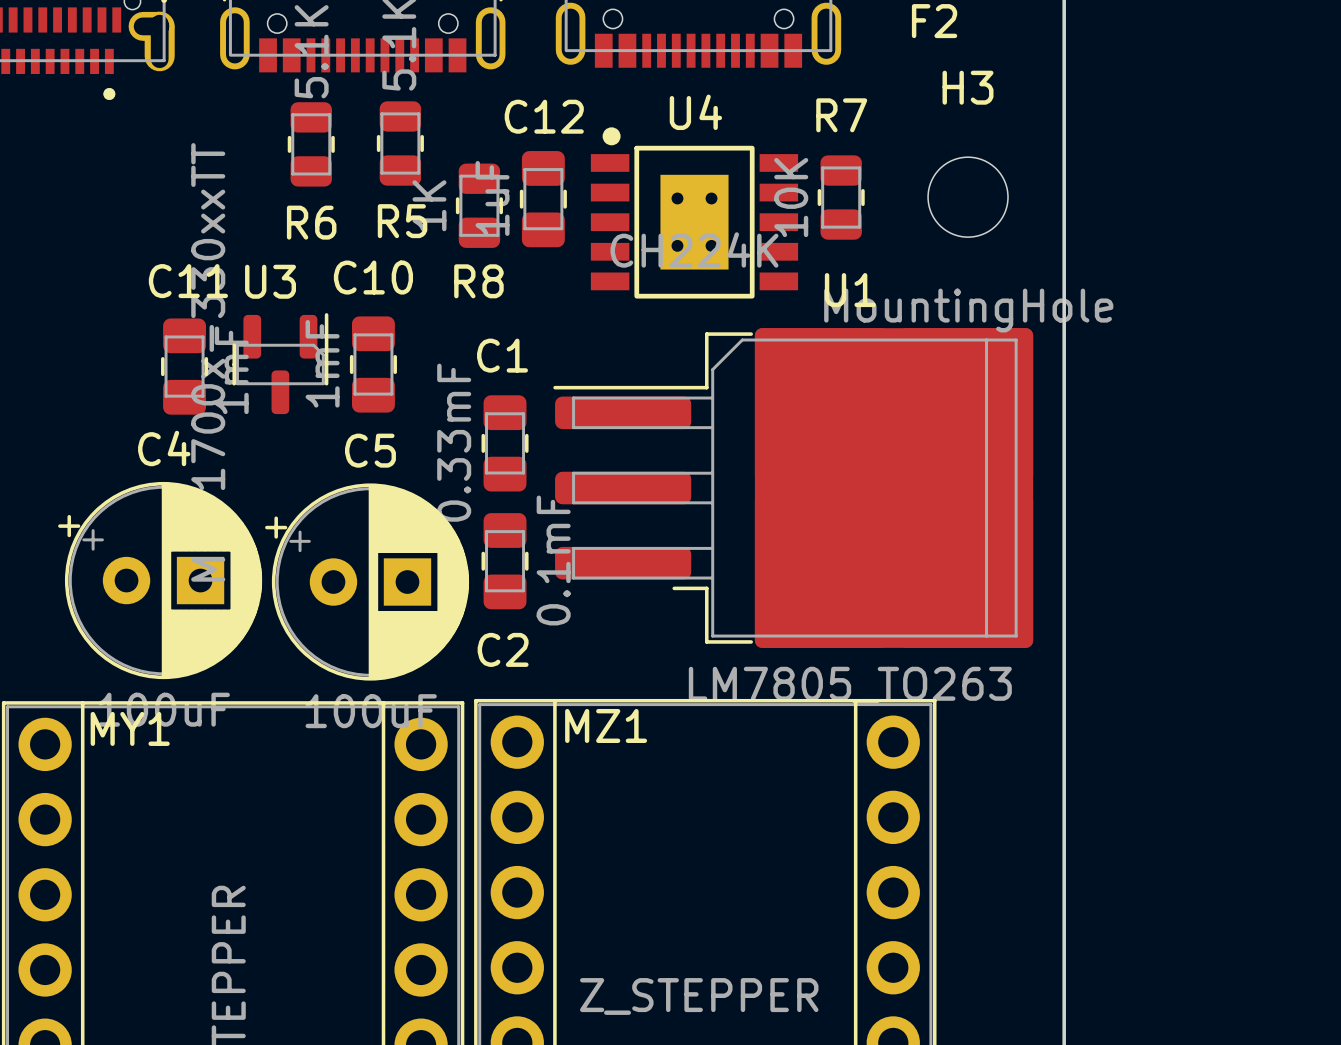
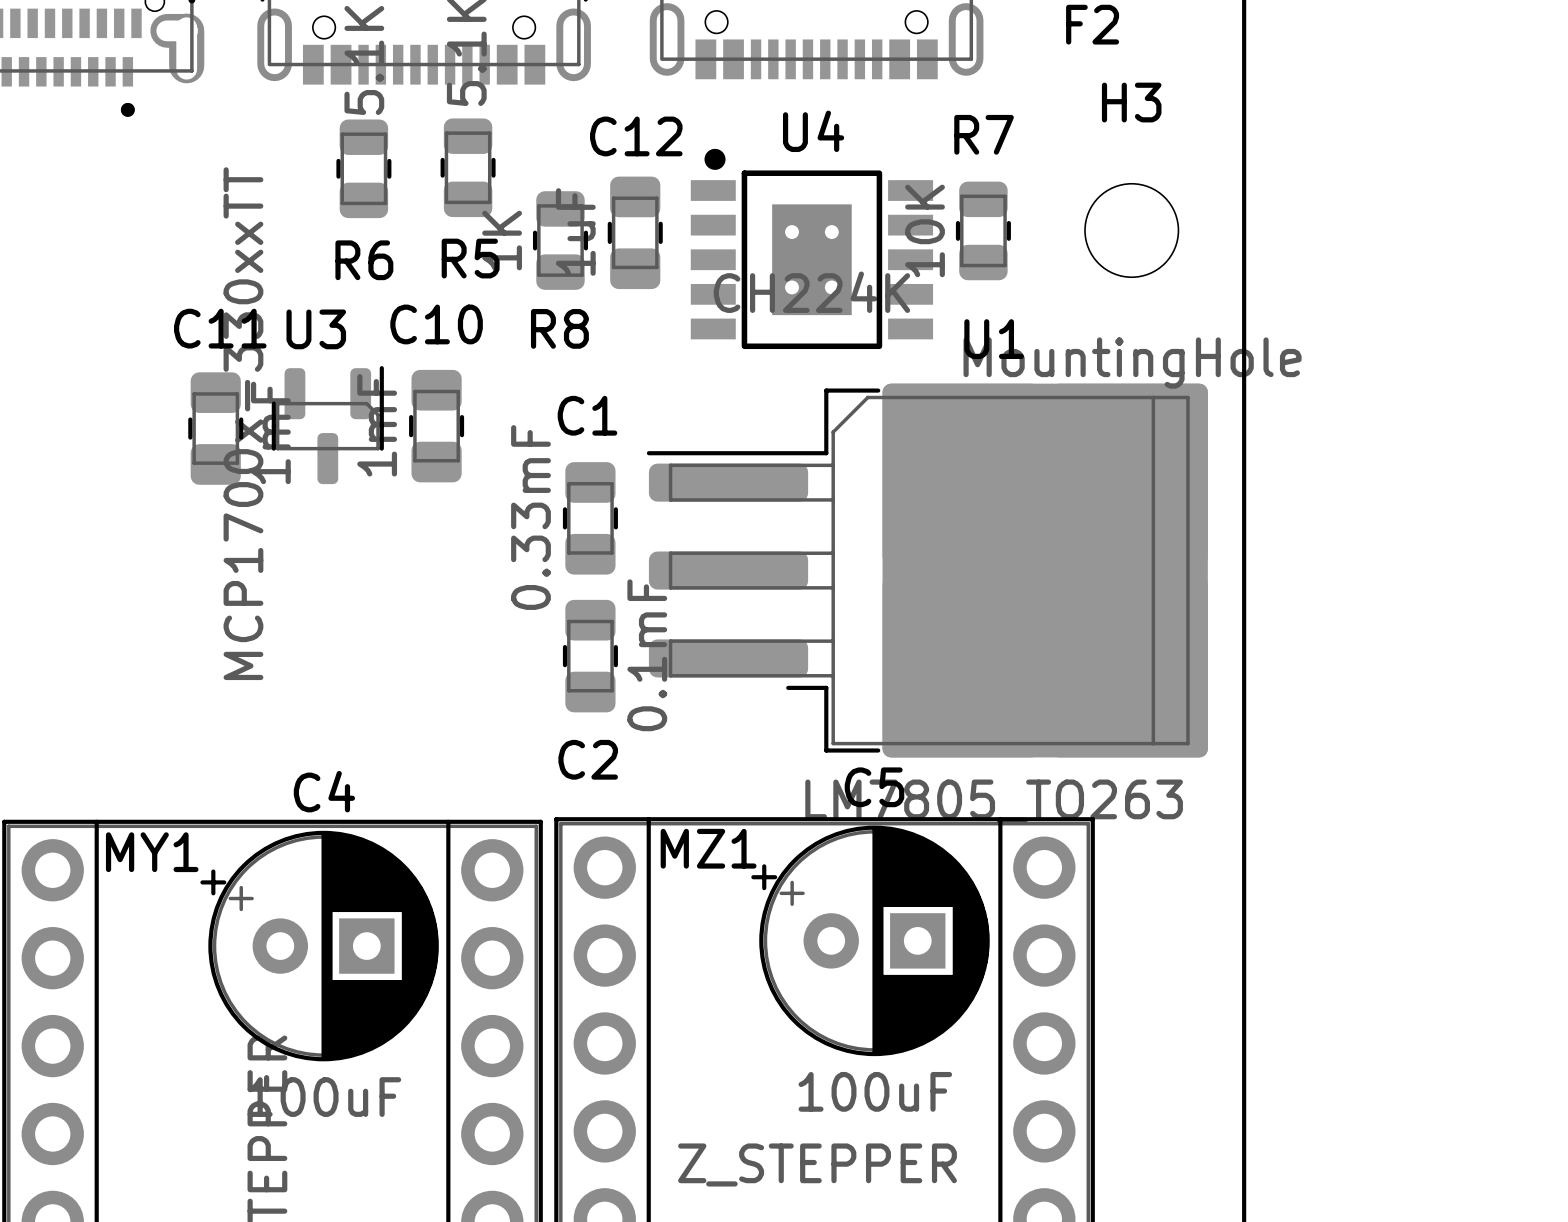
C4 position: (160, 580) -> (319, 946)
C5 position: (367, 582) -> (870, 940)

